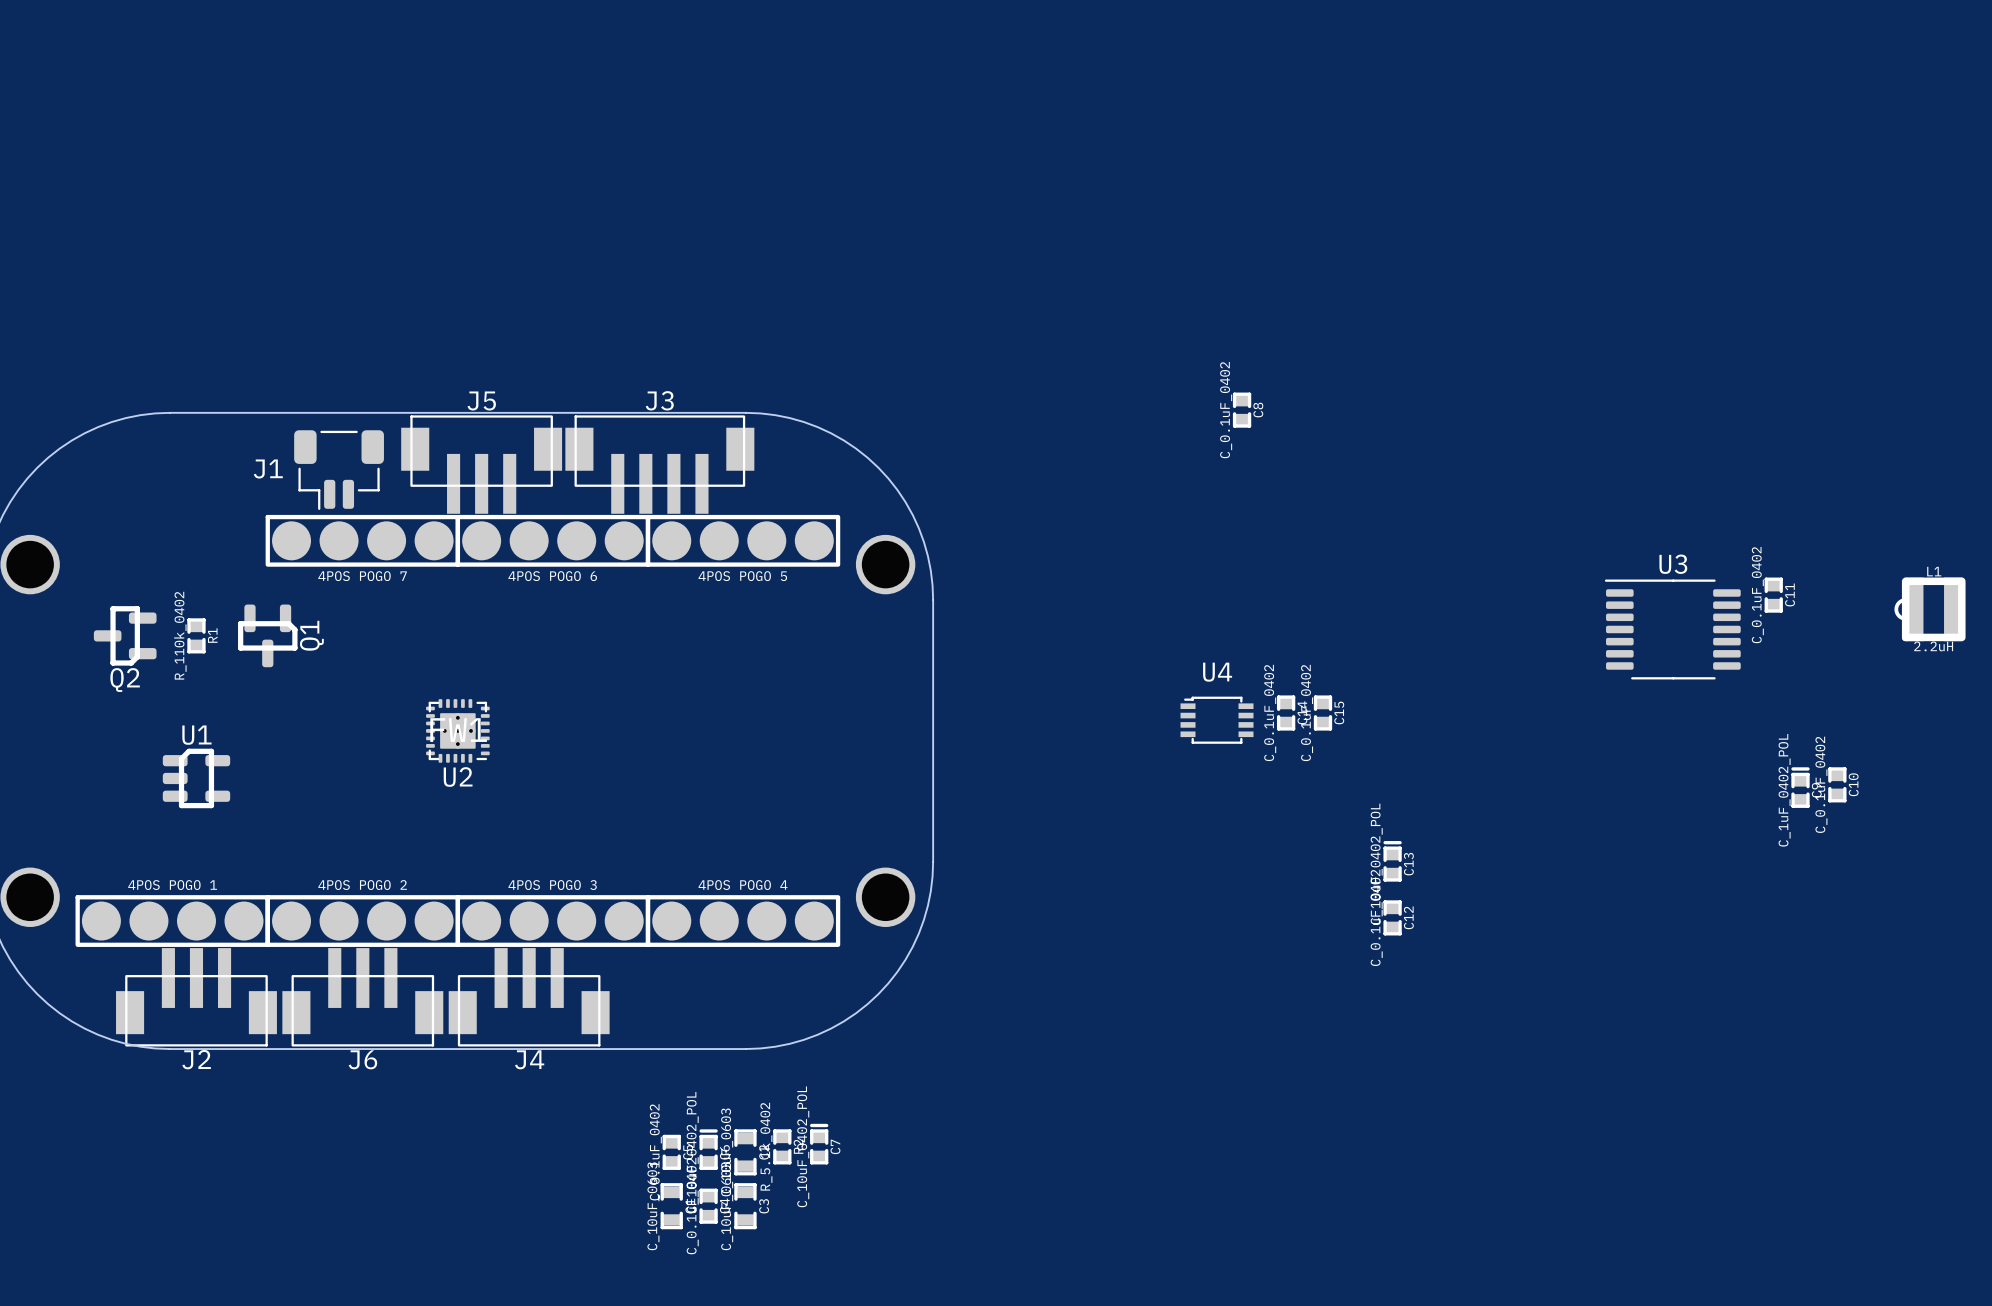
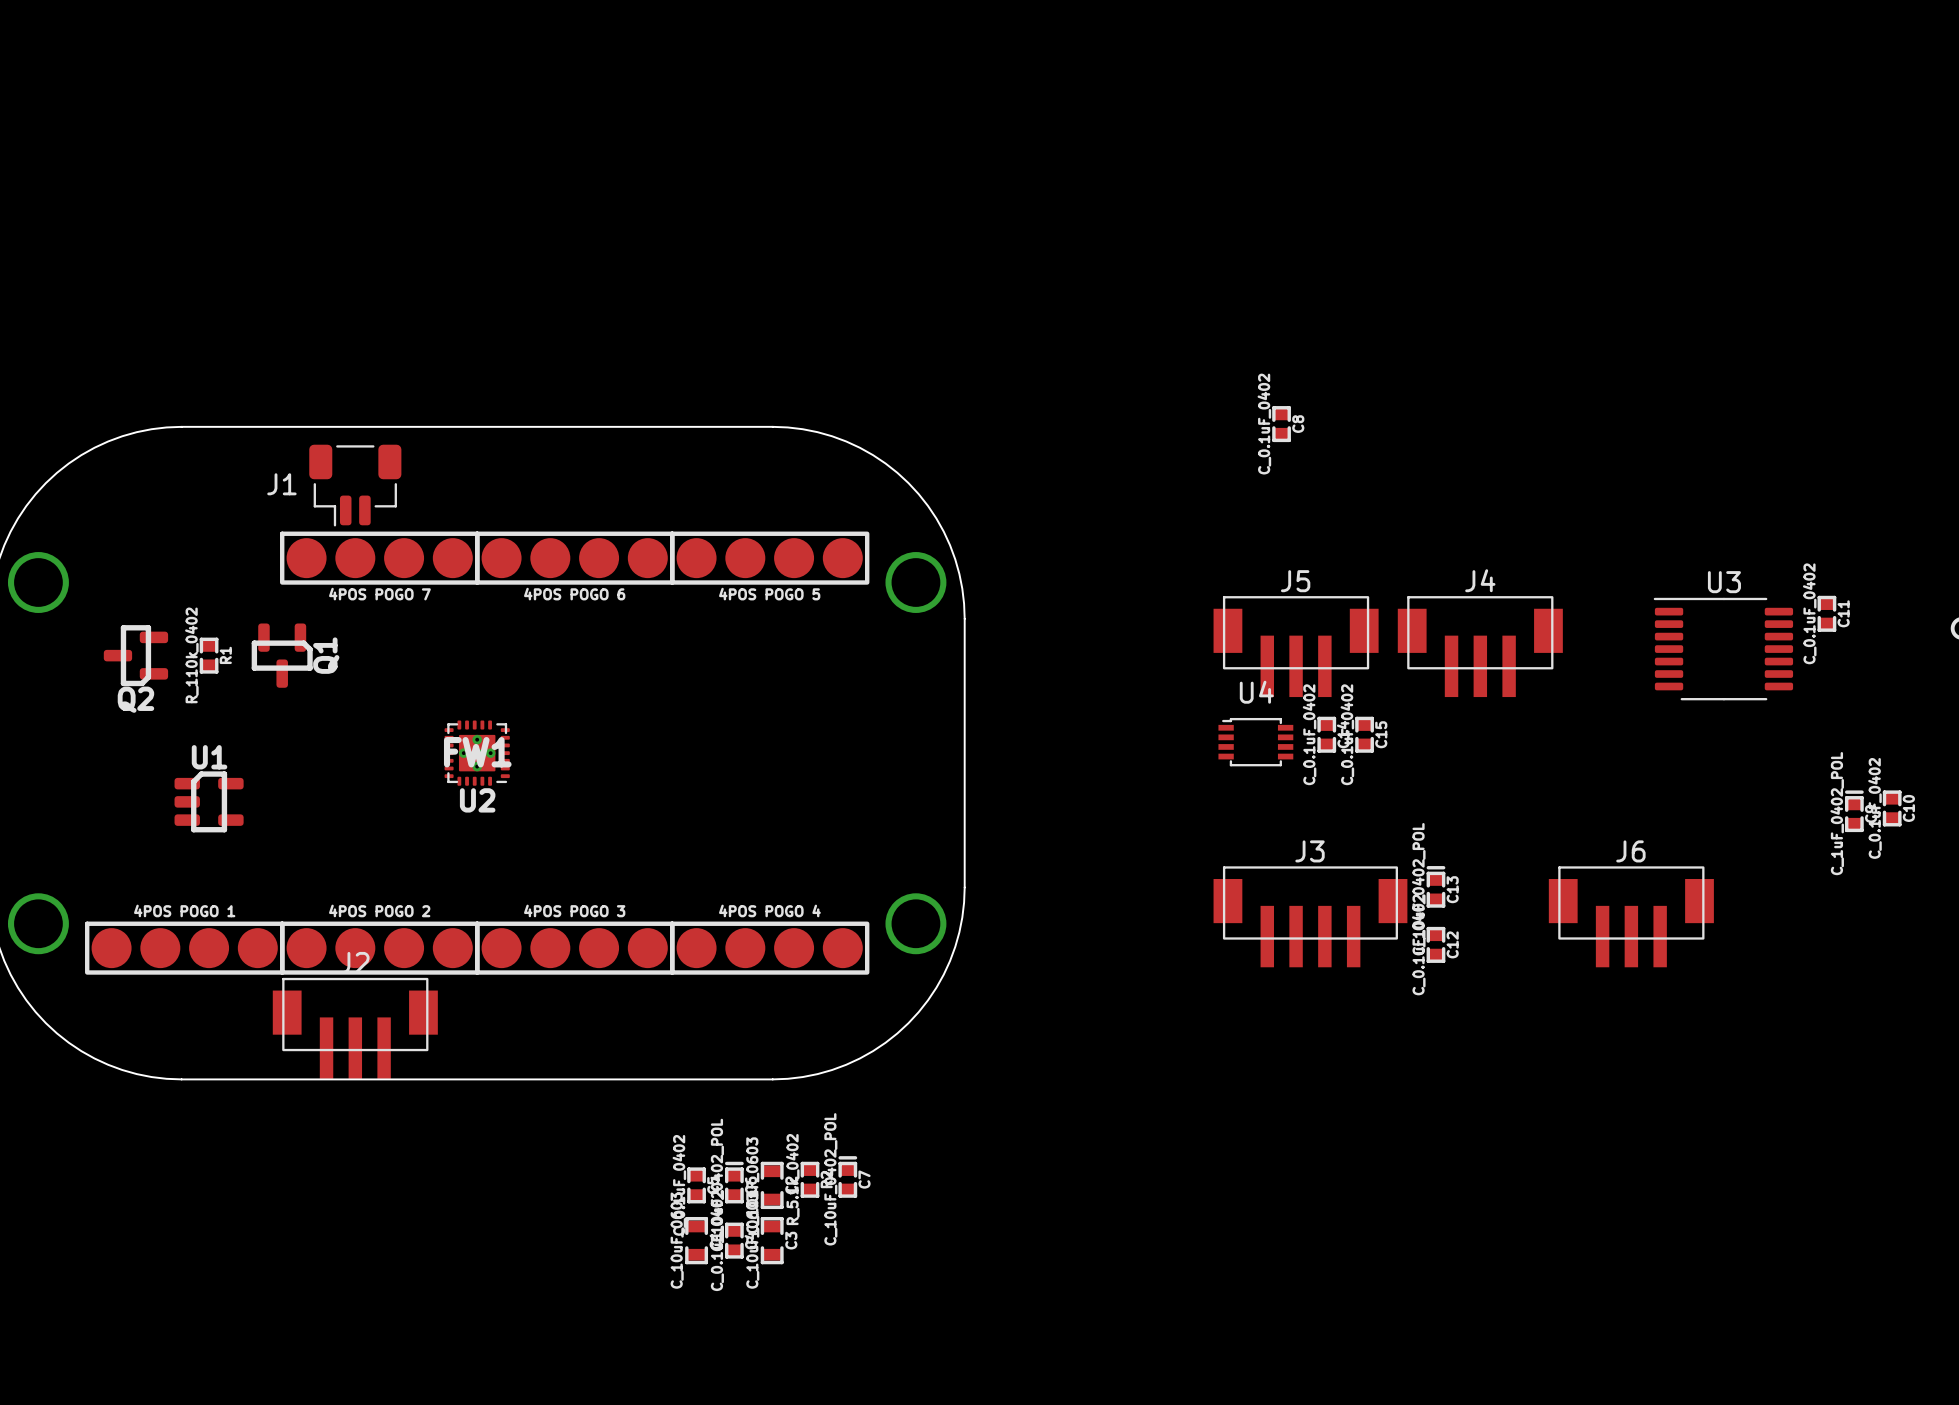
J5 position: (481, 464) -> (1296, 646)
J3 position: (659, 464) -> (1310, 916)
J2 rotation: 0° (196, 997) -> 180° (355, 1028)
J2 position: (196, 997) -> (355, 1028)
J6 rotation: 0° (362, 997) -> 180° (1631, 916)
J6 position: (362, 997) -> (1631, 916)
J4 rotation: 0° (529, 997) -> 180° (1480, 646)
J4 position: (529, 997) -> (1480, 646)

